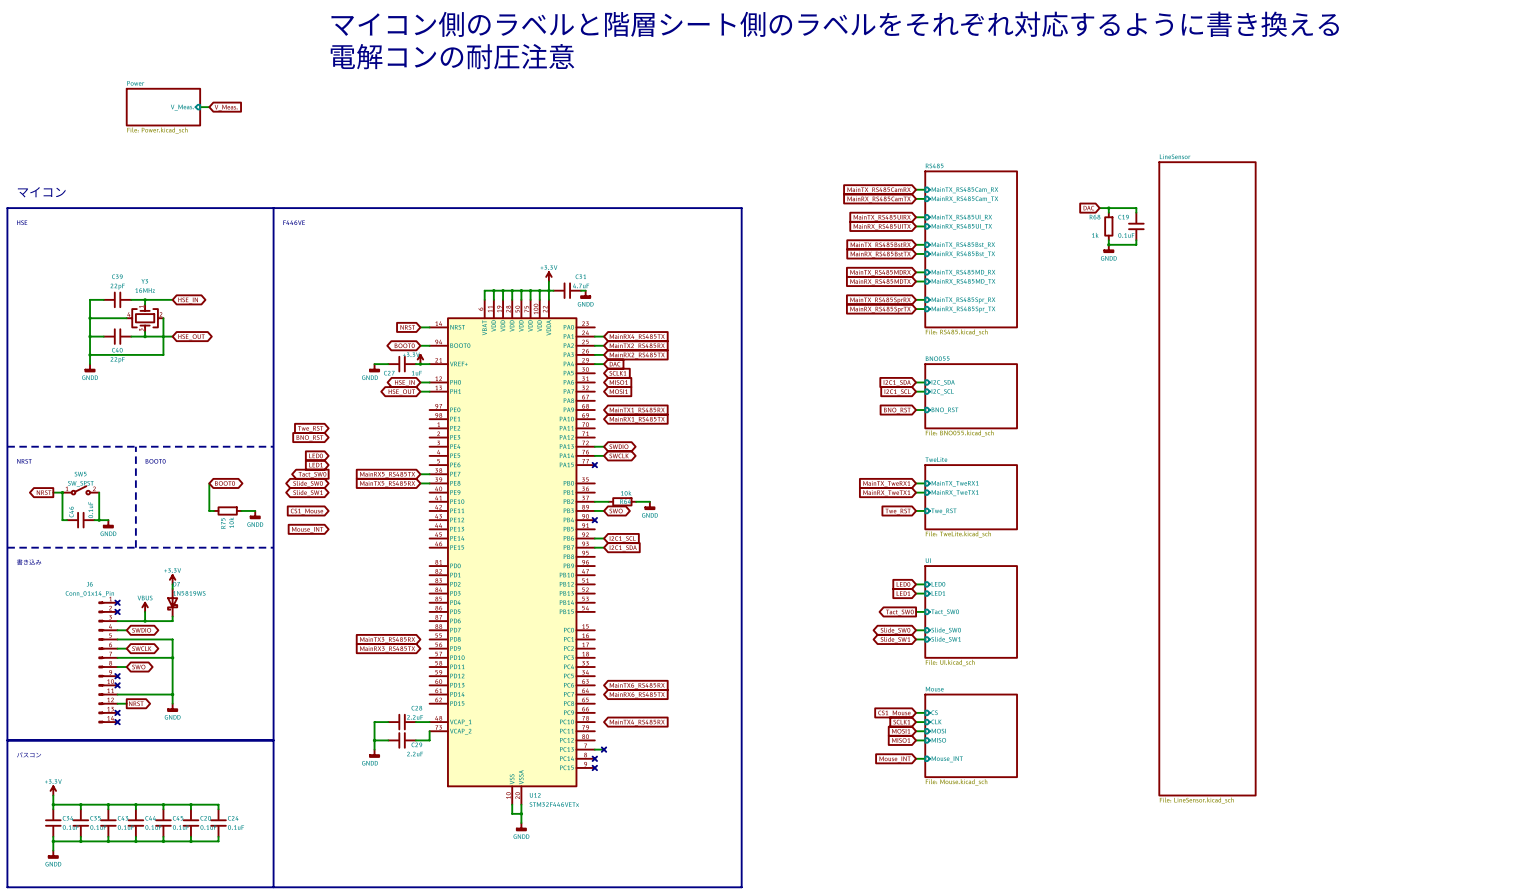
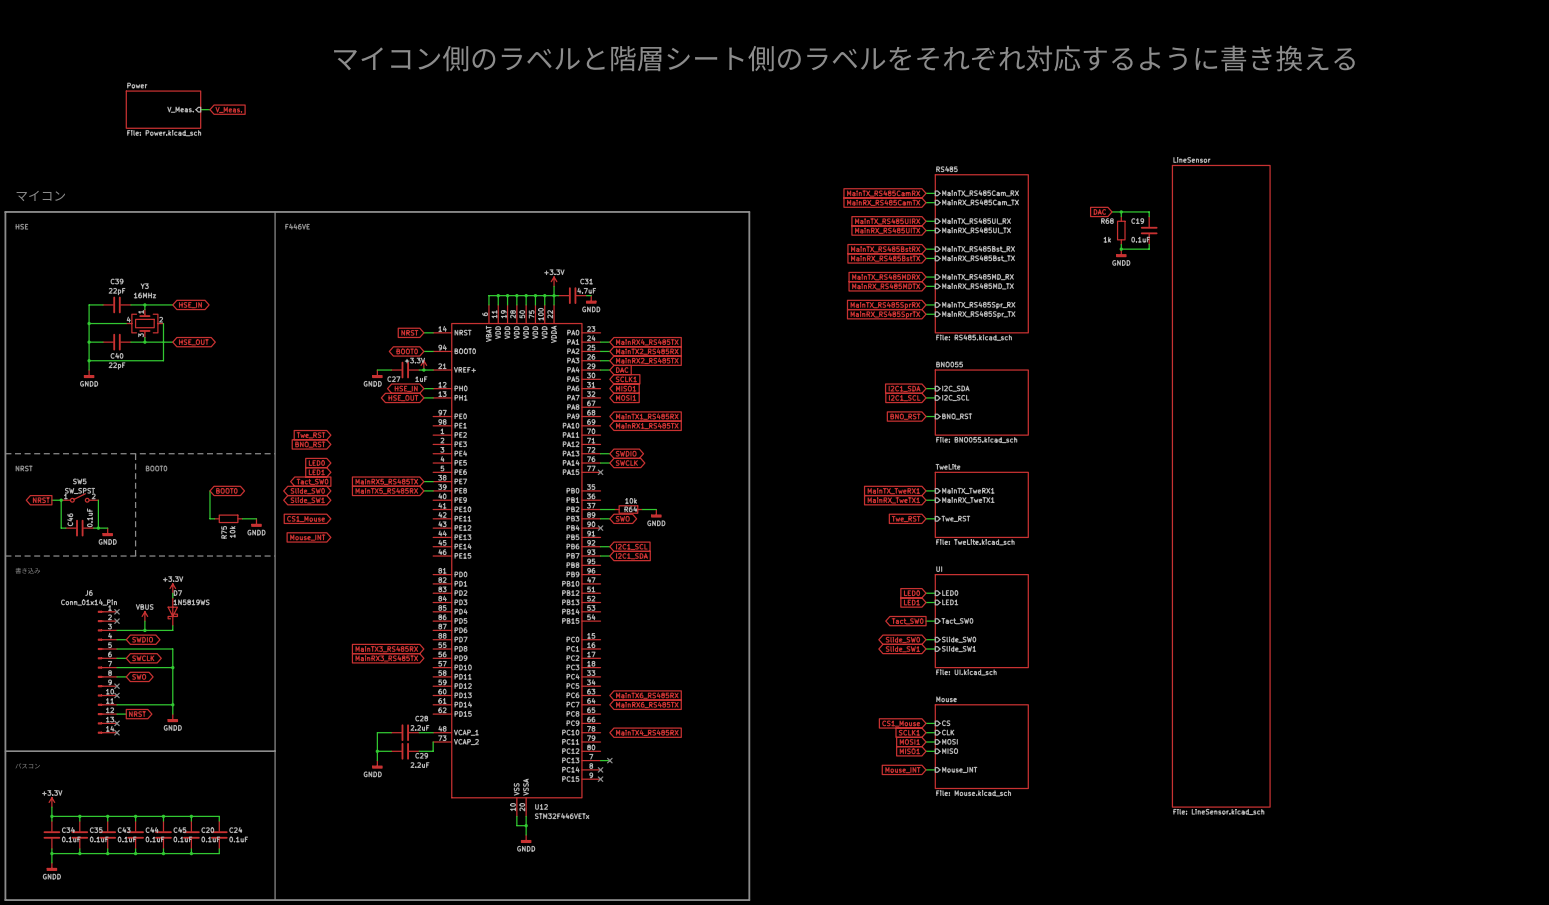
text: マイコン側のラベルと階層シート側のラベルをそれぞれ対応するように書き換える (835, 24) -> none
text: 電解コンの耐圧注意 (452, 56) -> マイコン側のラベルと階層シート側のラベルをそれぞれ対応するように書き換える (844, 58)

